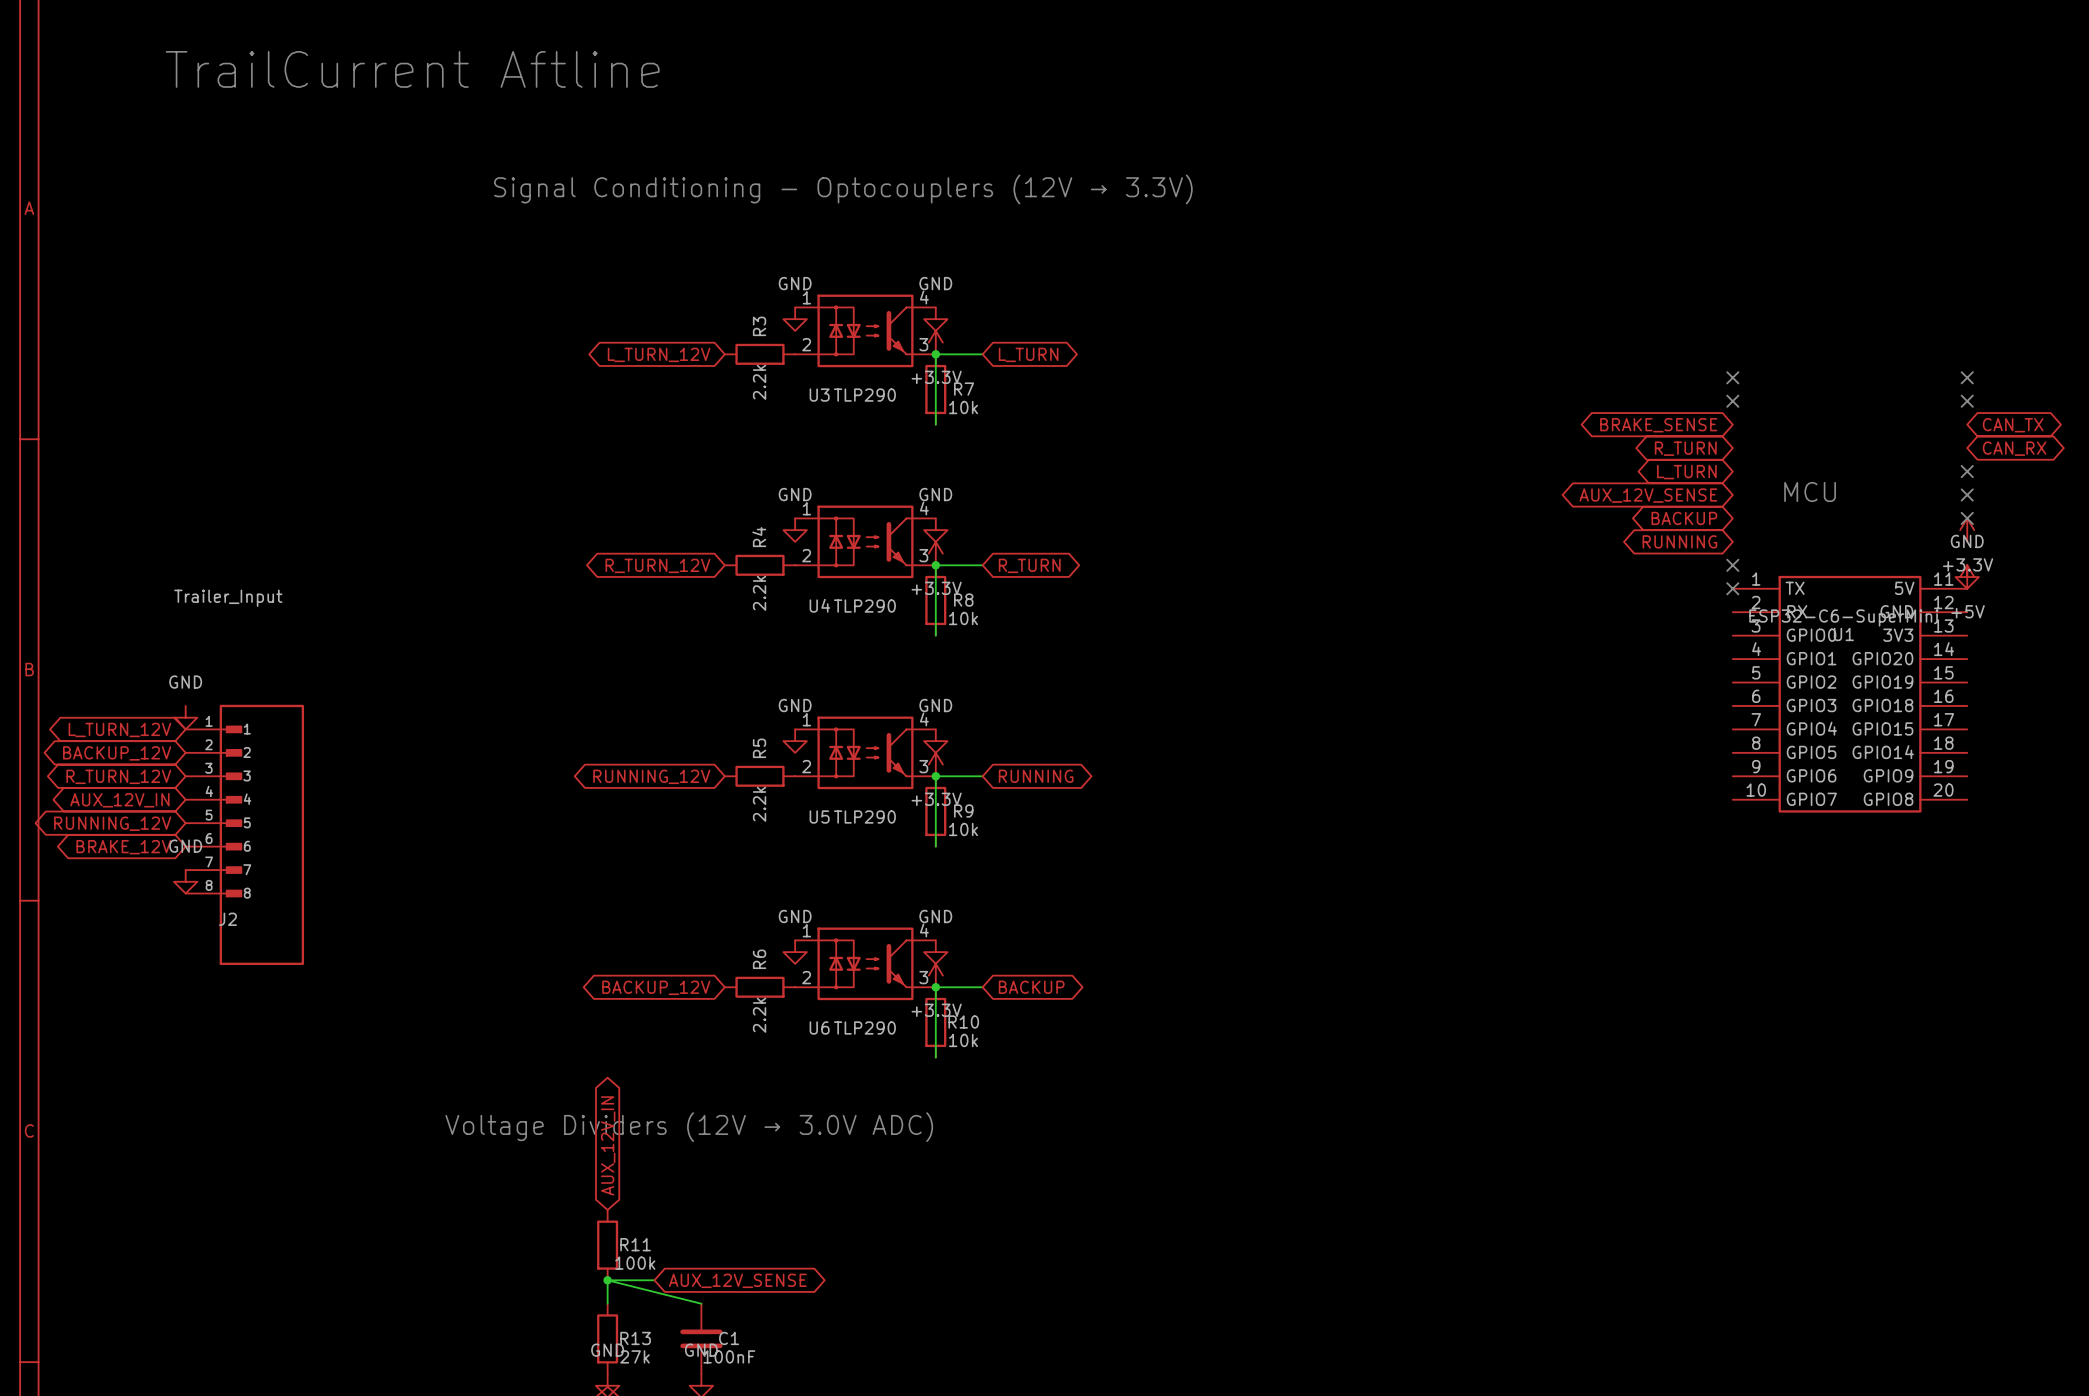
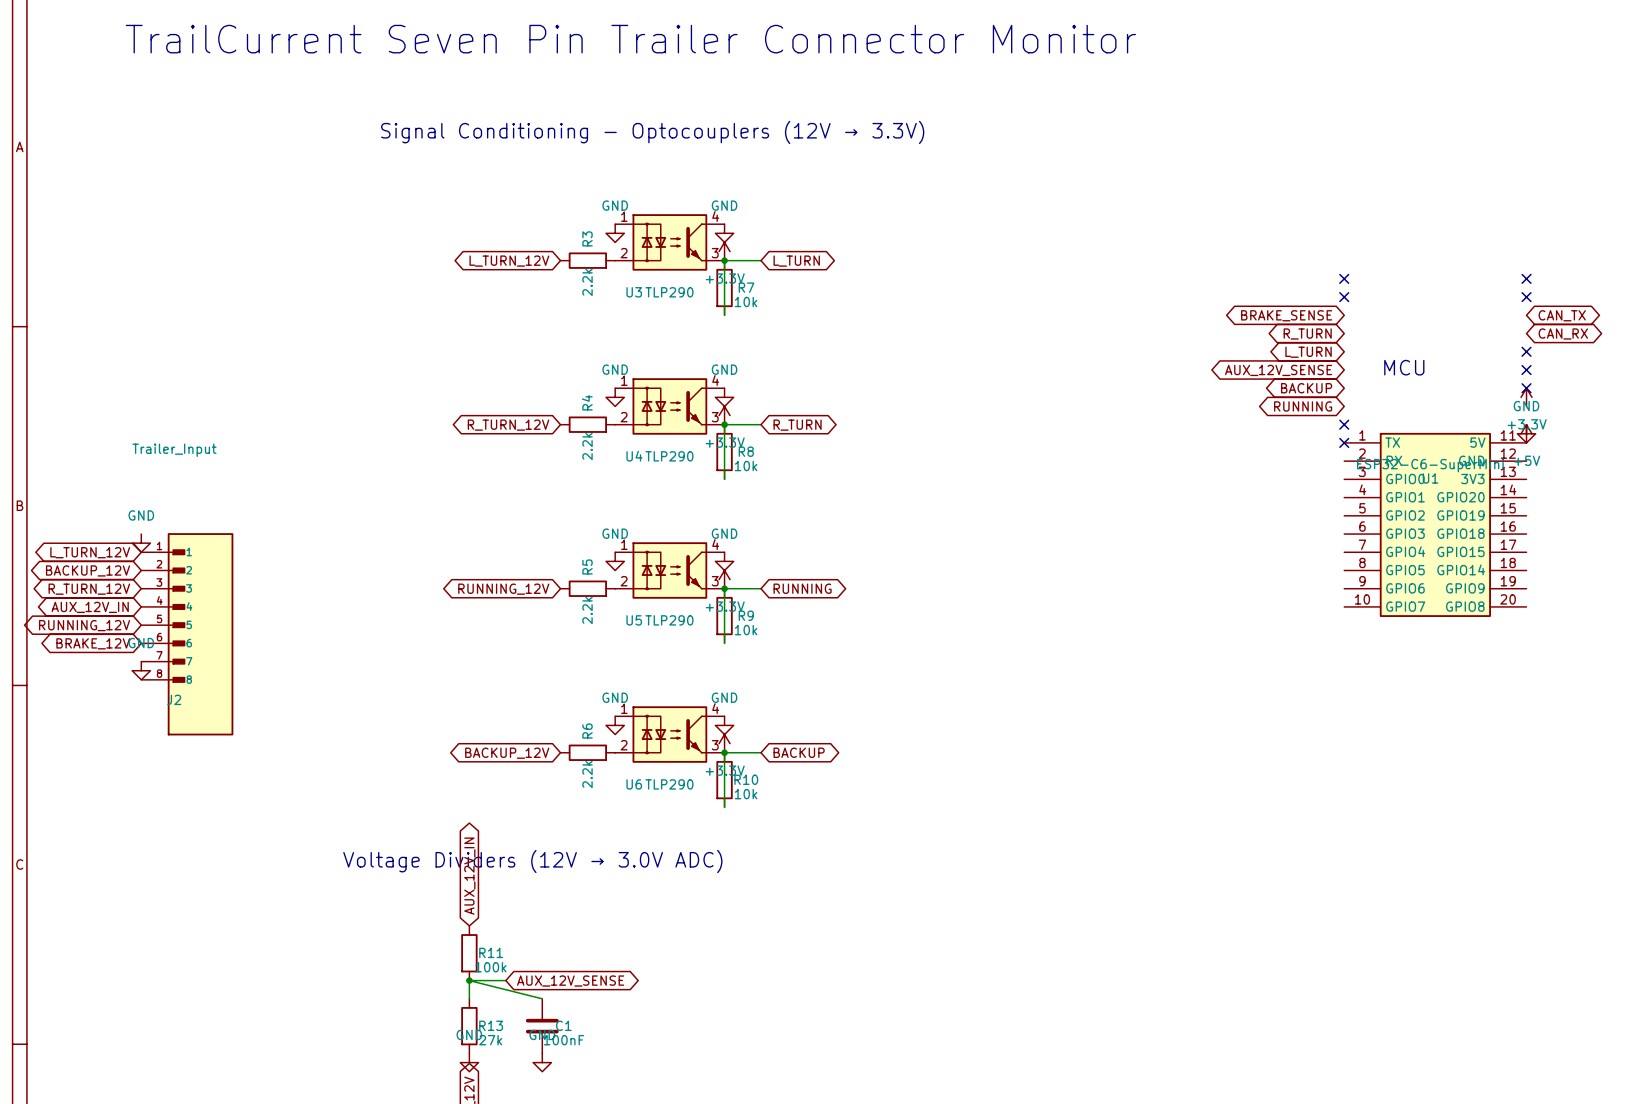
text: TrailCurrent Aftline (412, 69) -> TrailCurrent Seven Pin Trailer Connector Monitor (630, 39)

